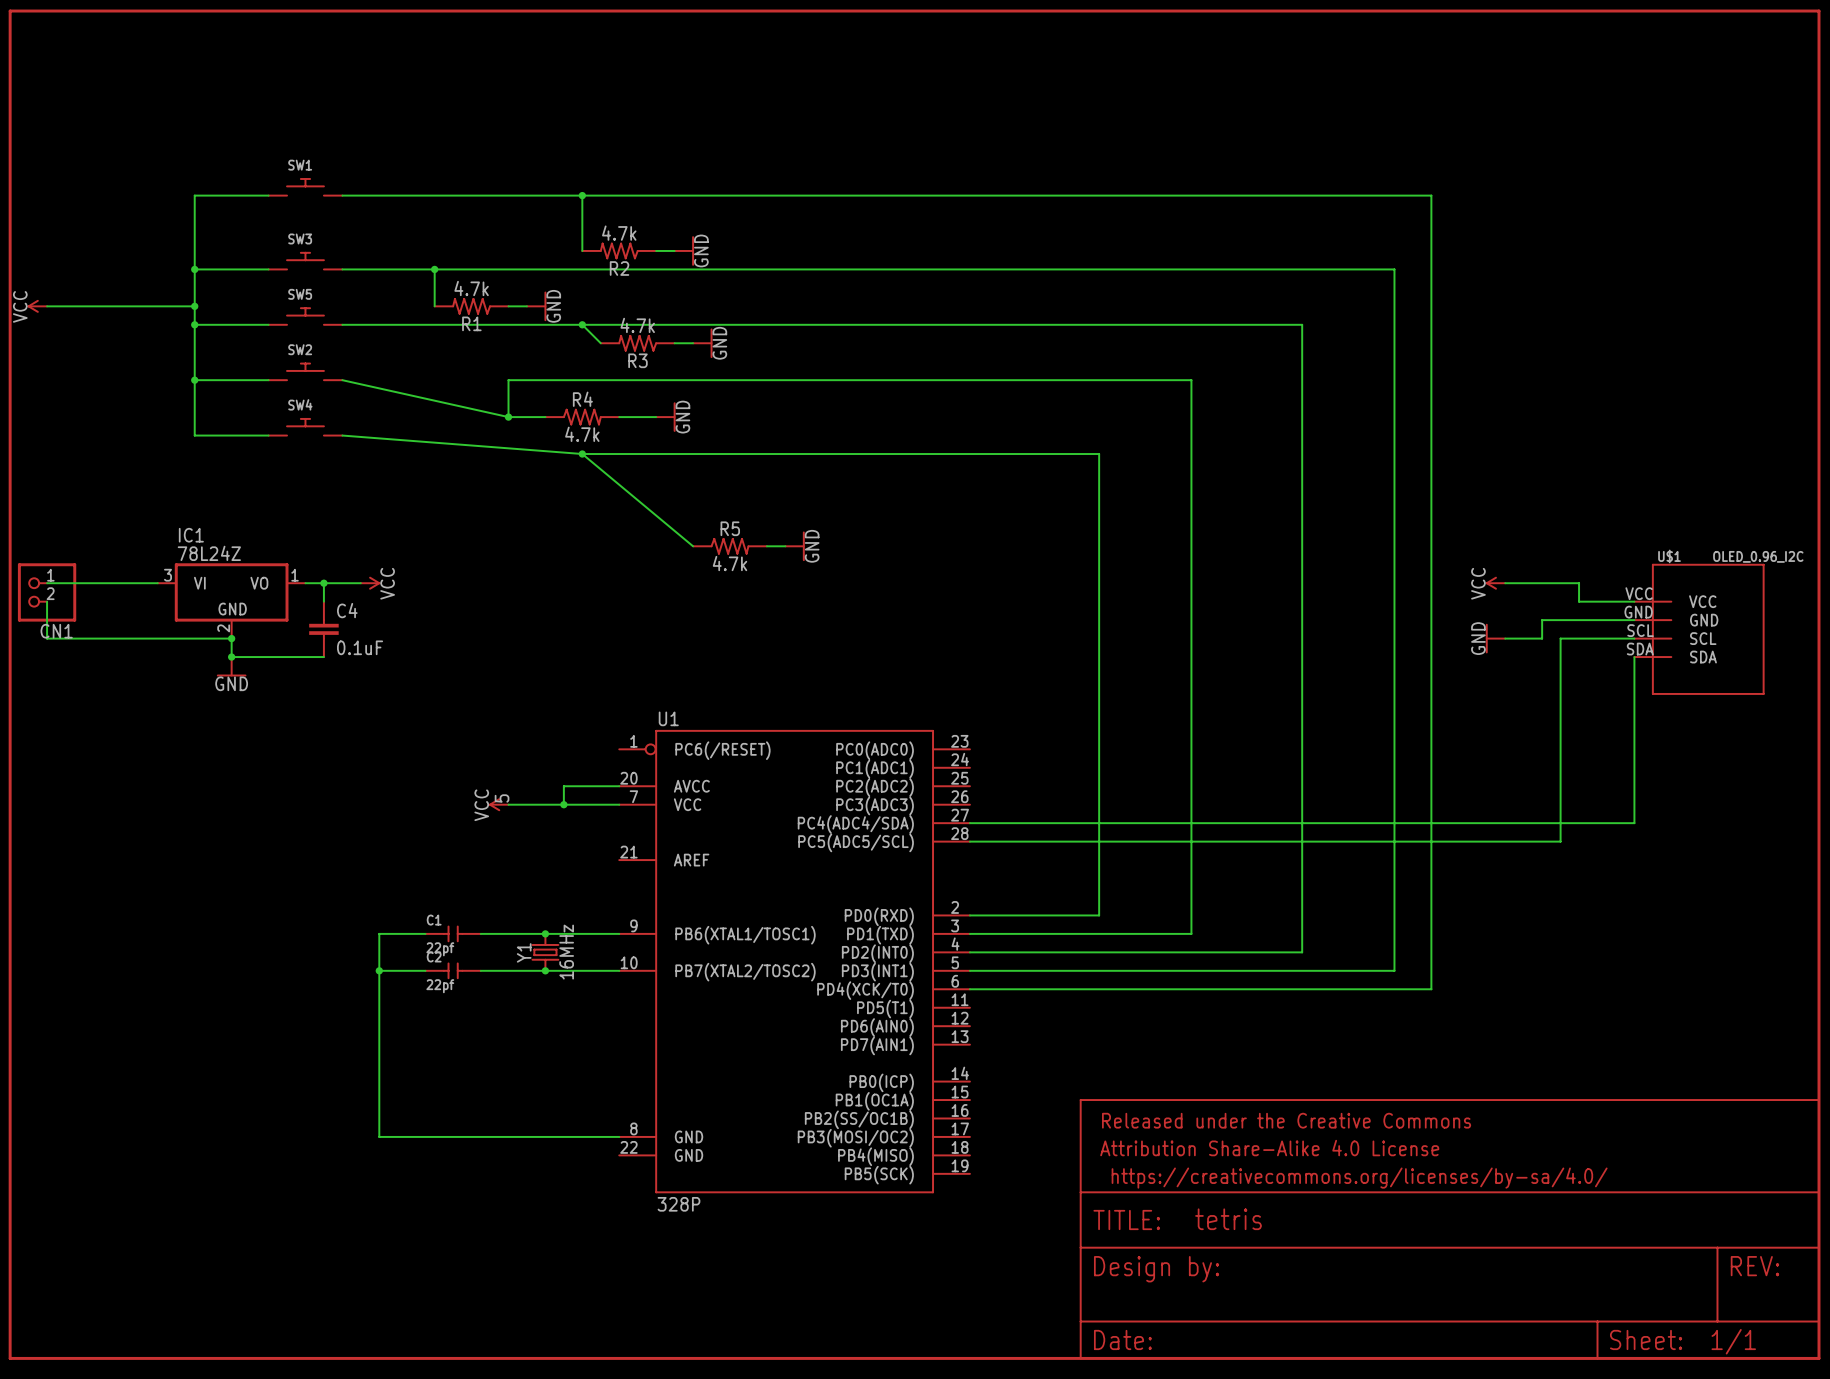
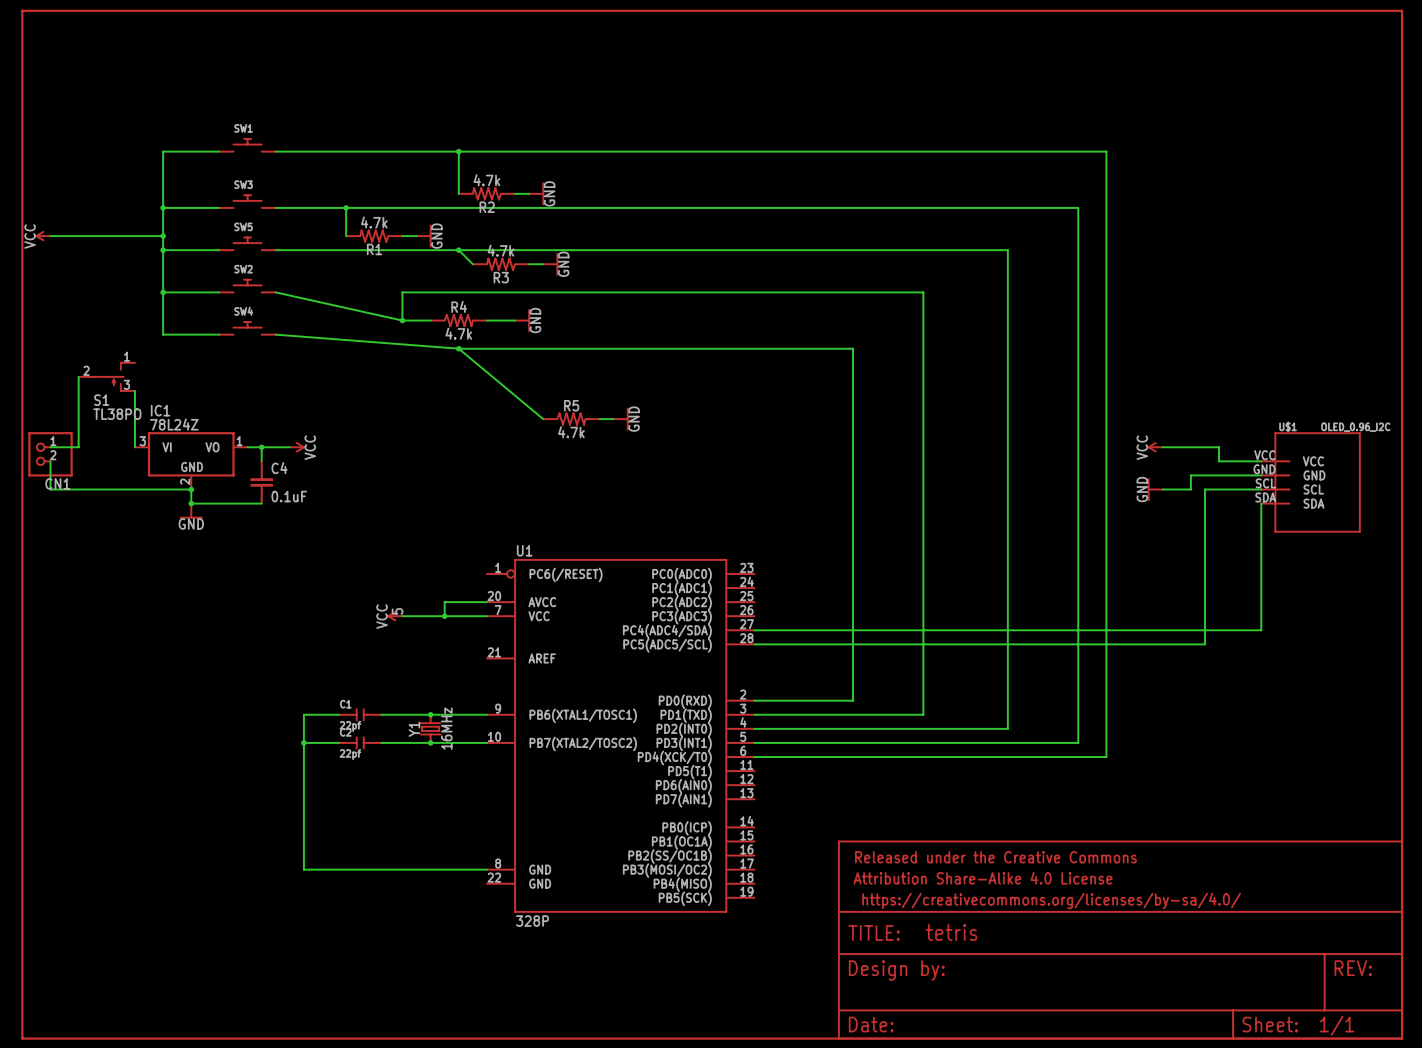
wire: none -> (78, 376) (78, 447)
S1: none -> TL38PO (106, 376)
wire: (83, 583) (157, 583) -> (134, 390) (134, 447)

